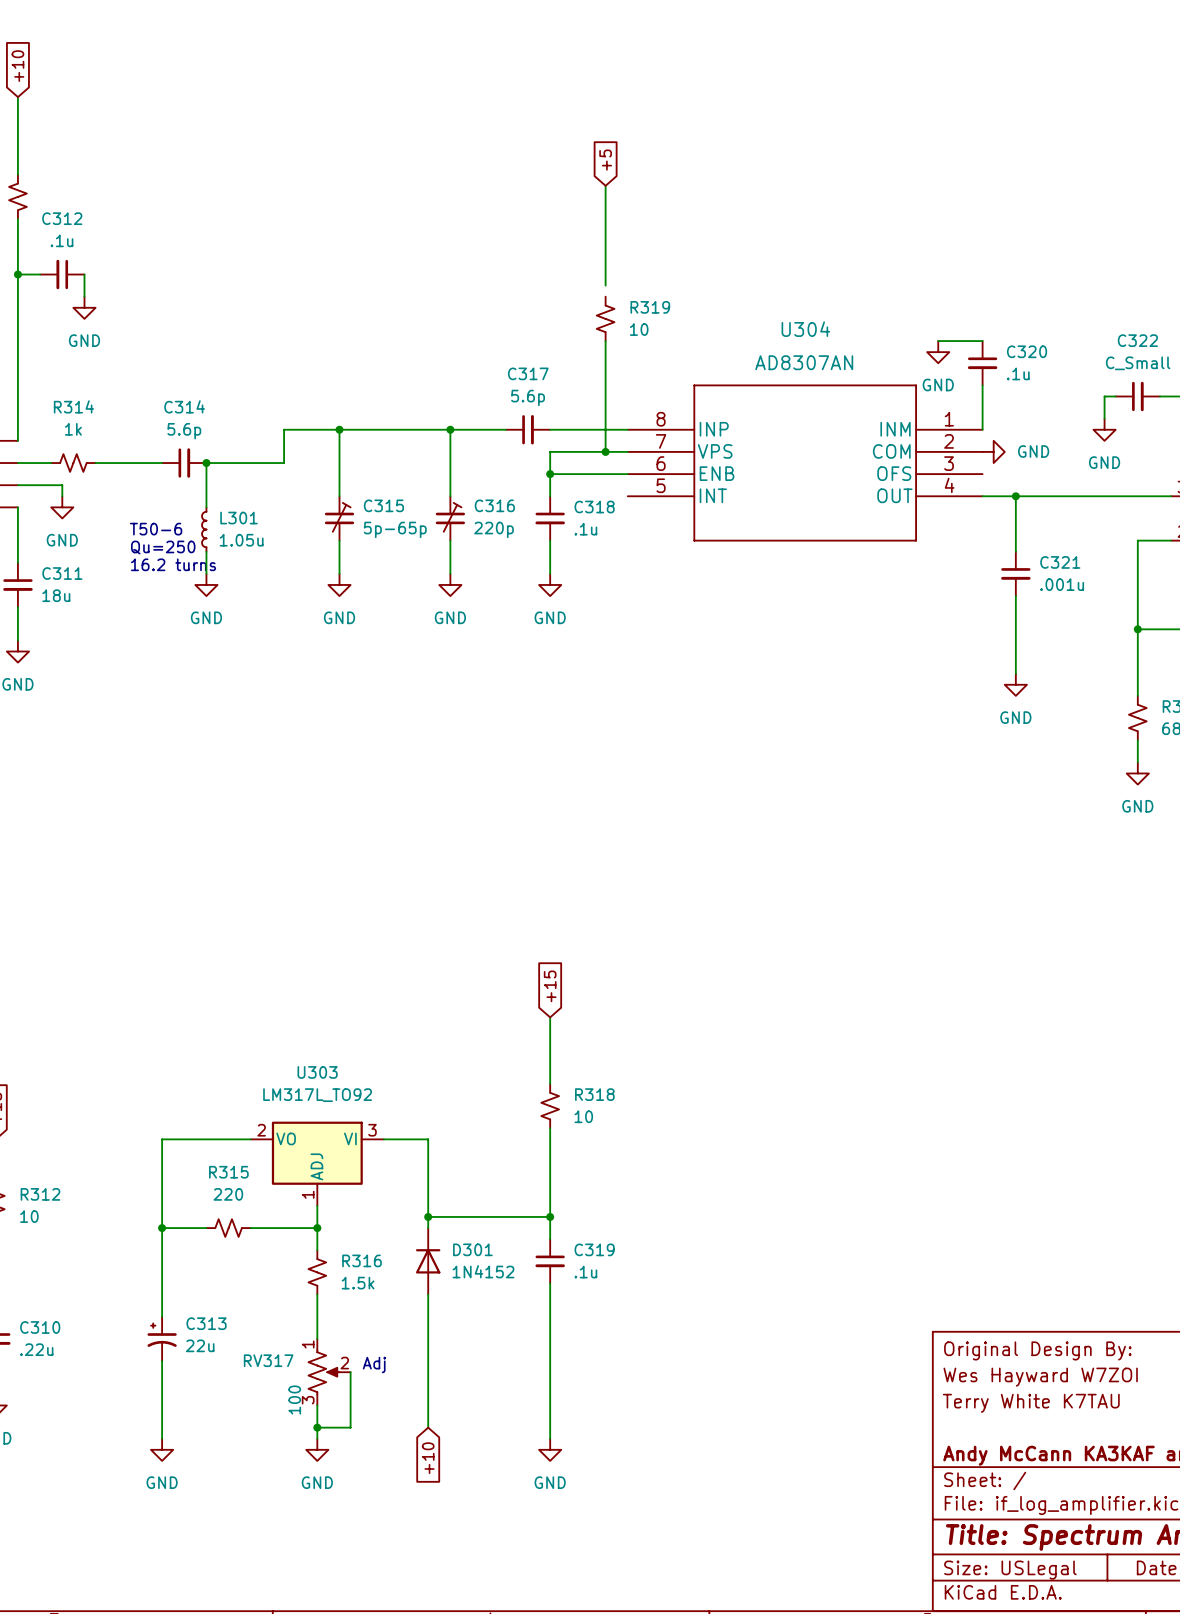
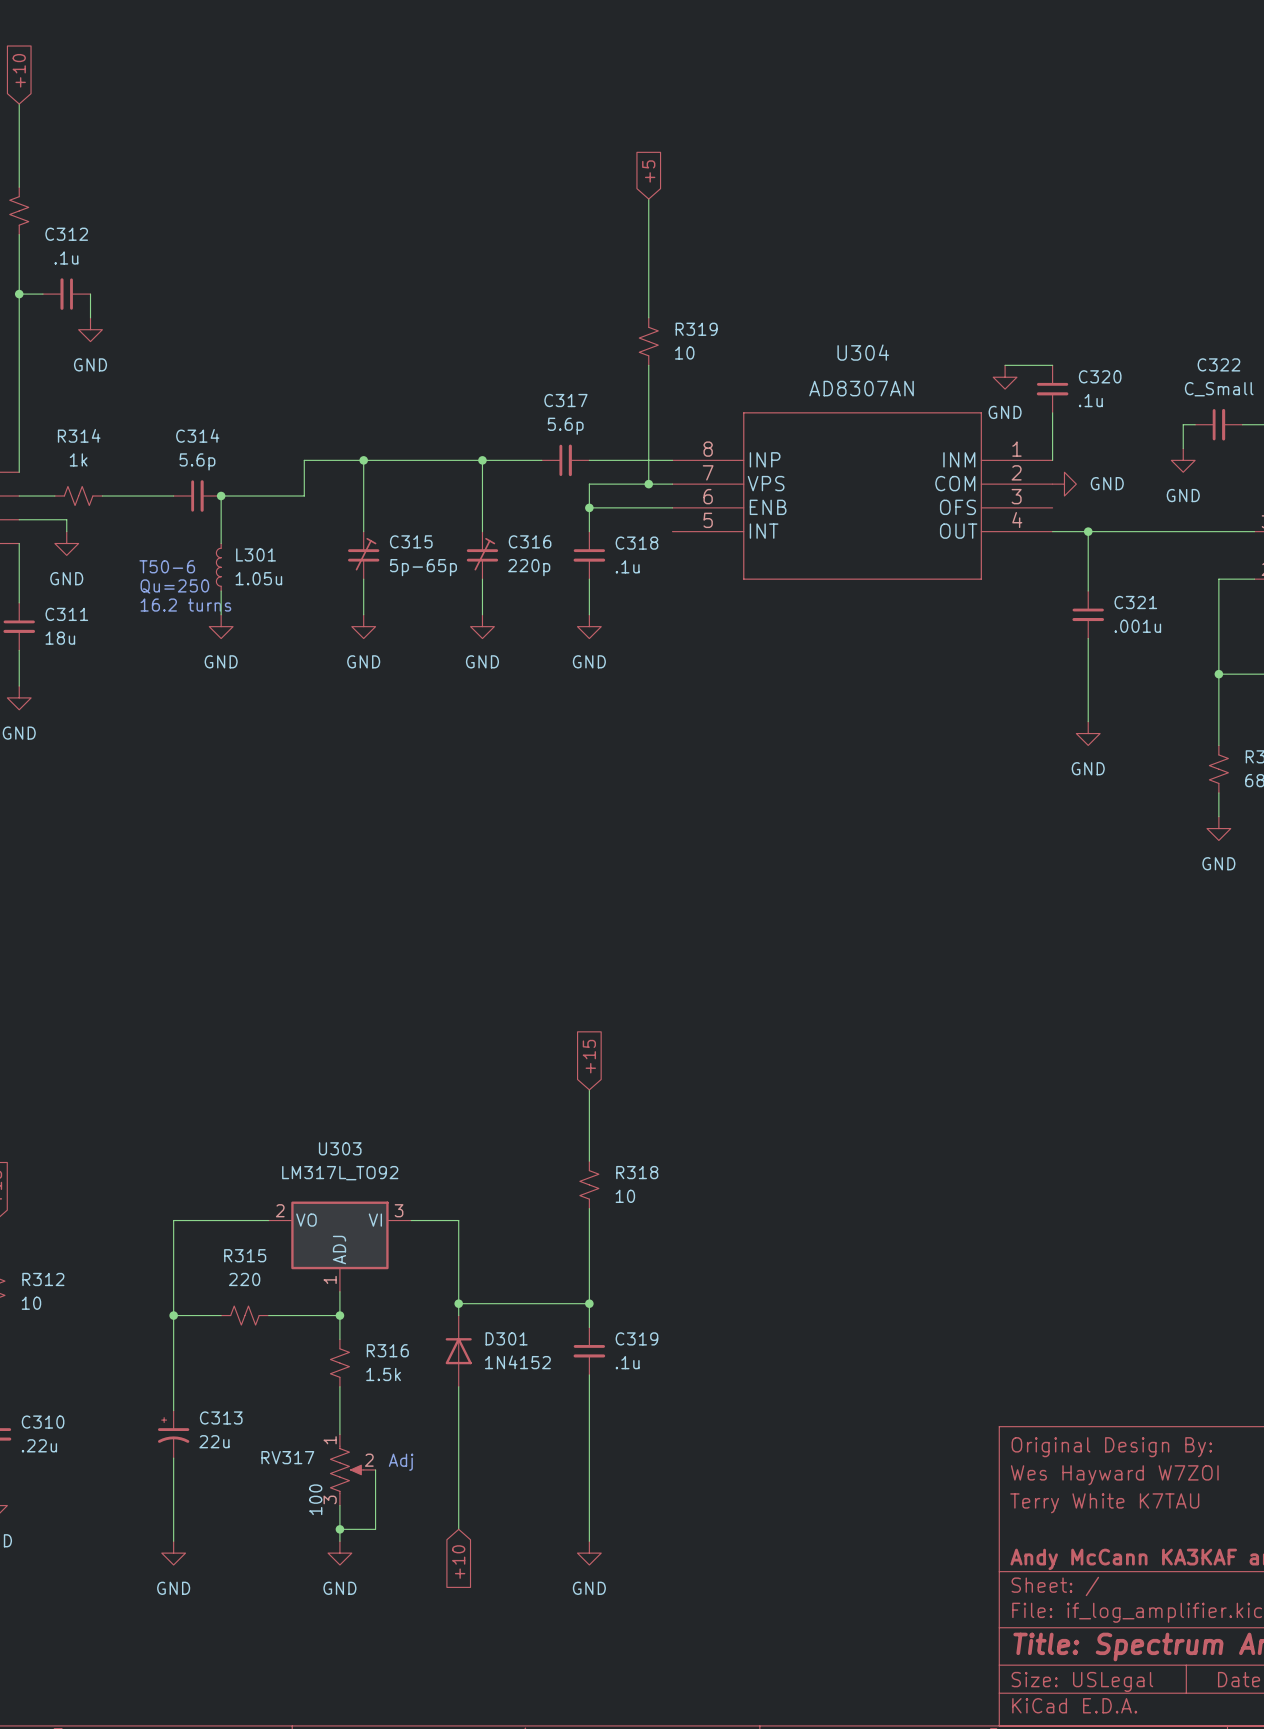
wire: none -> (648, 305) (648, 317)

